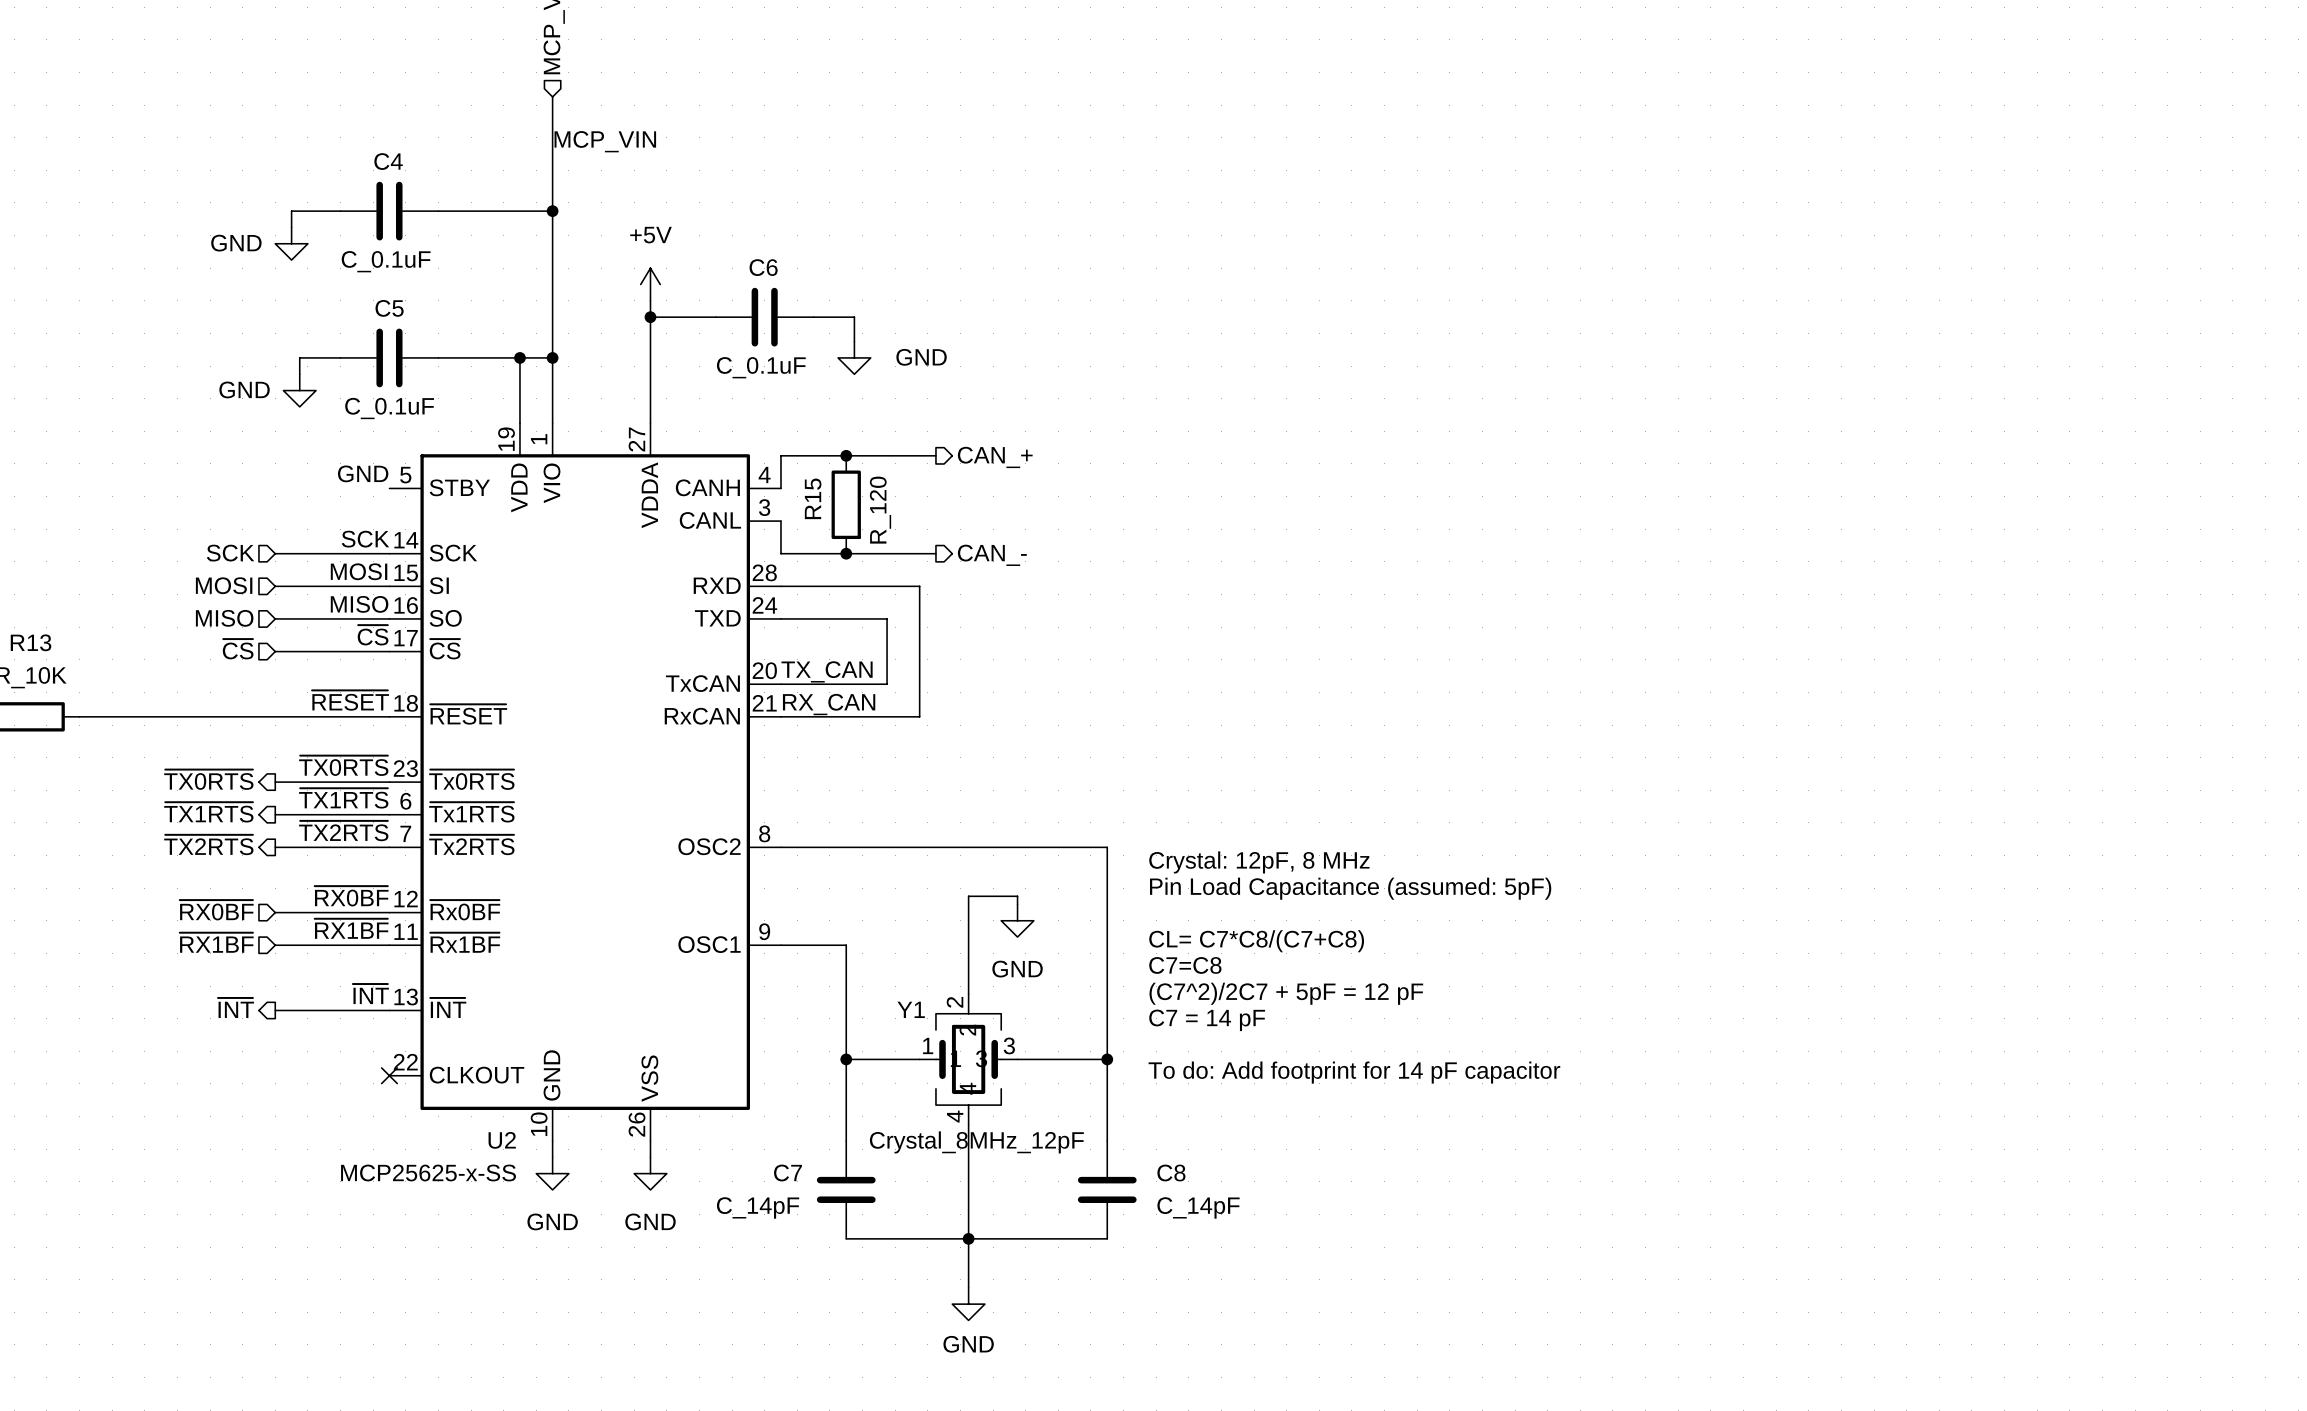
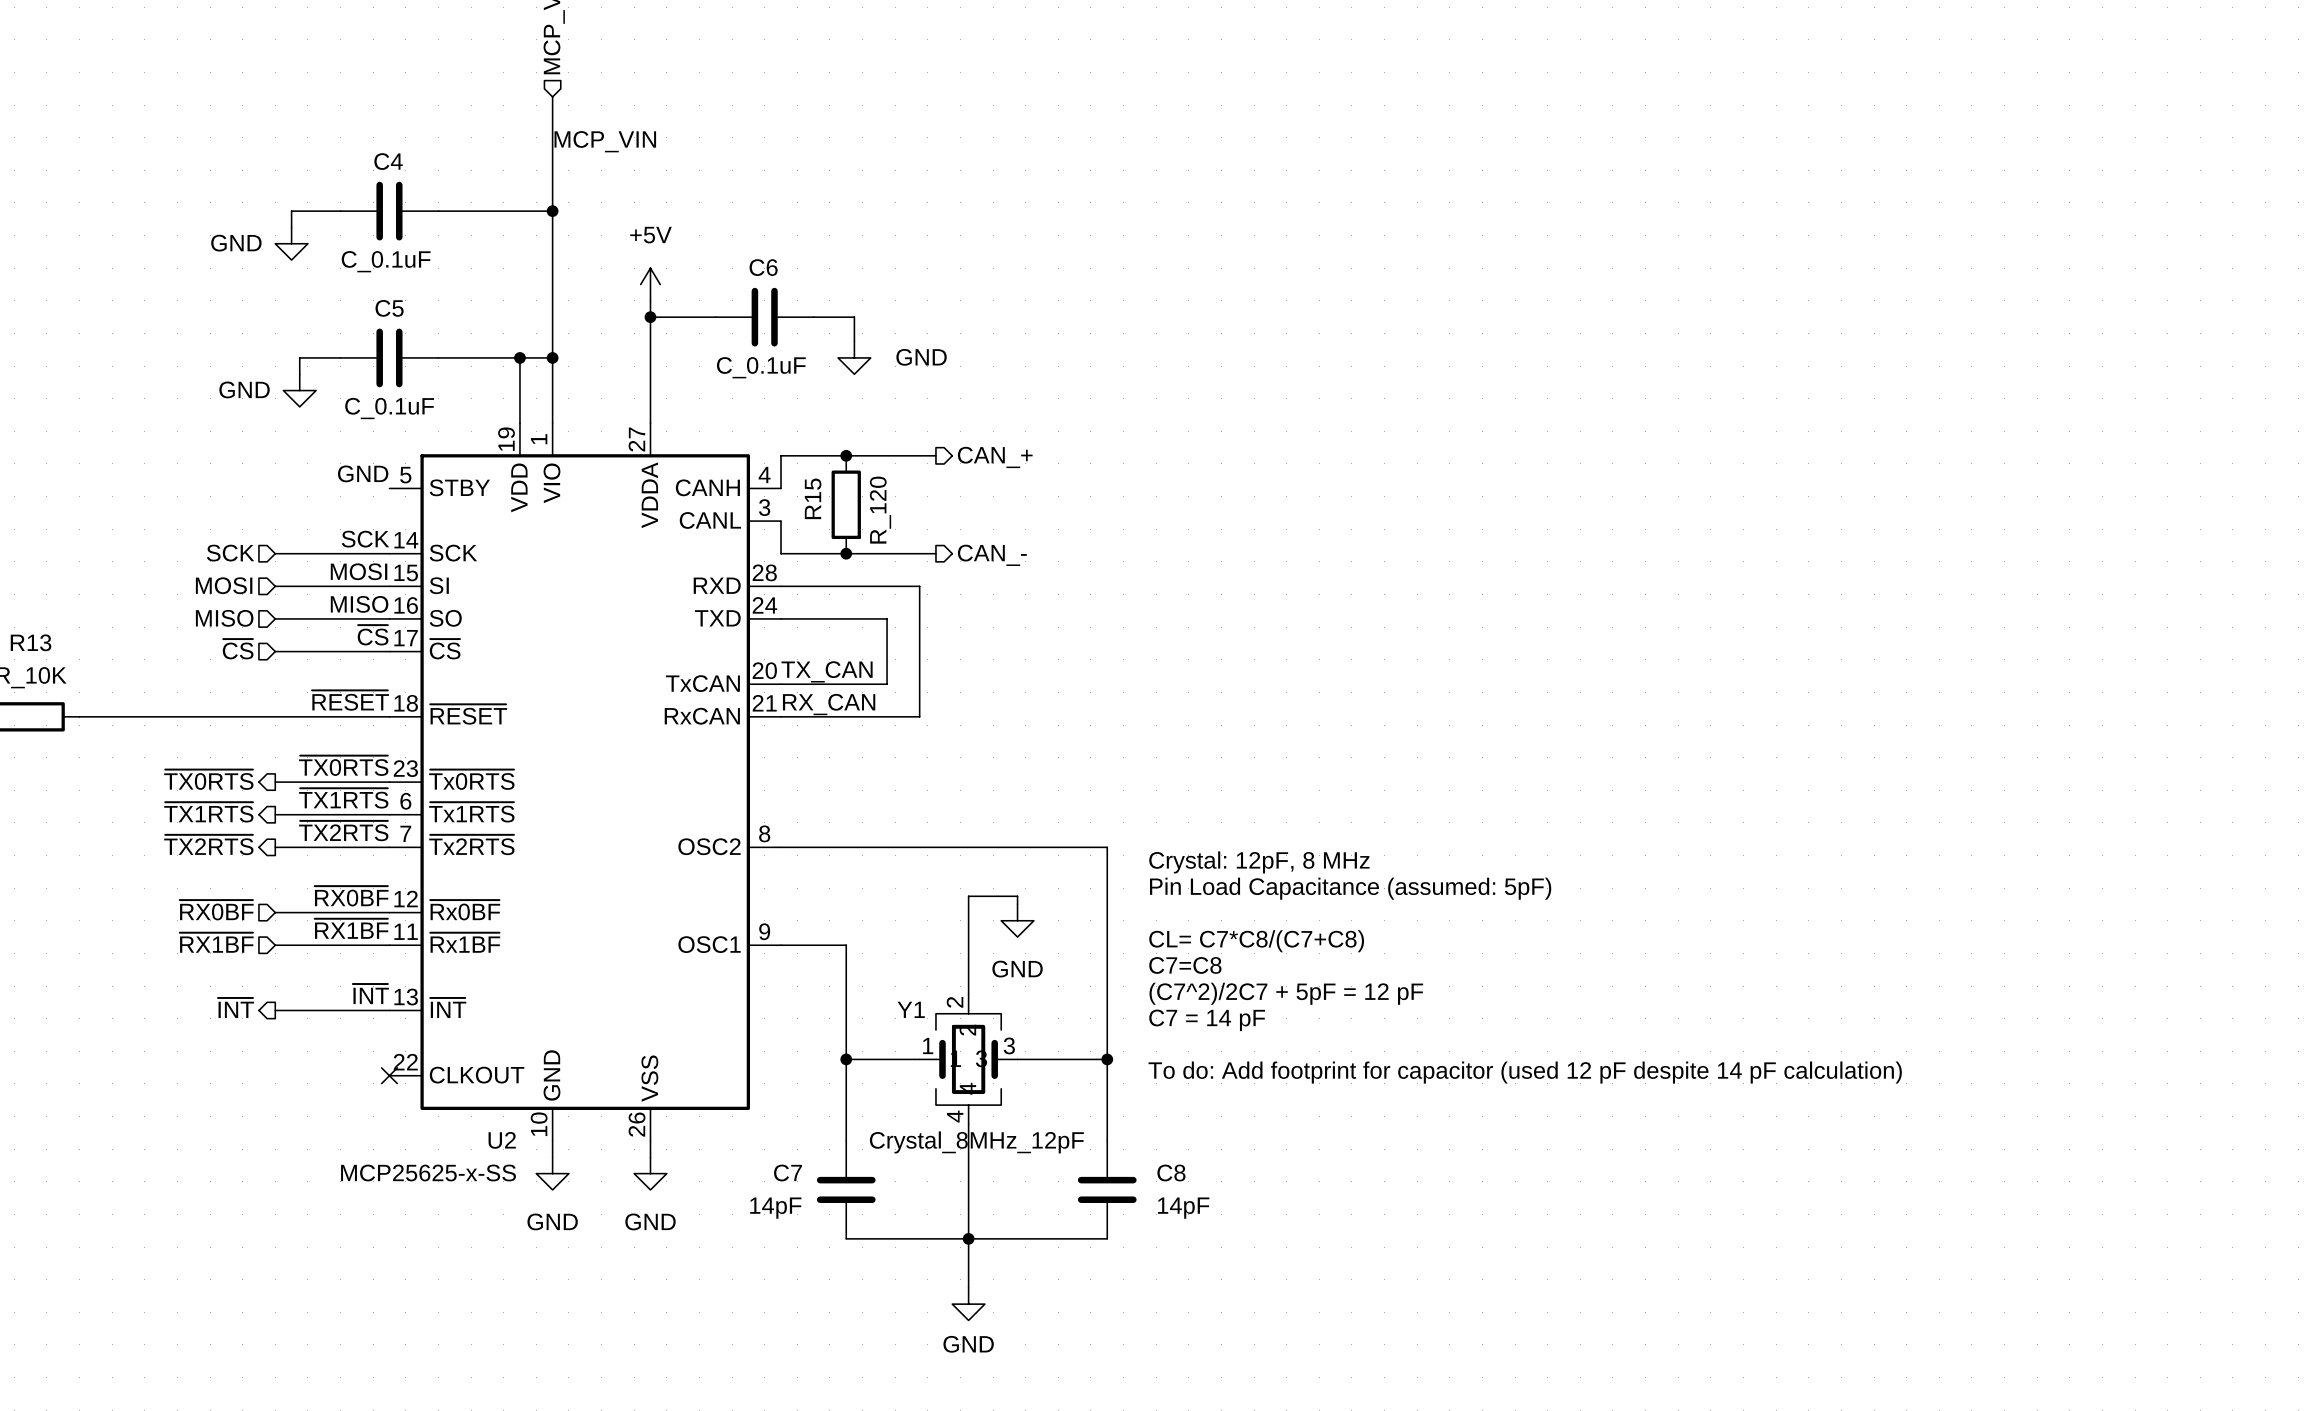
text: To do: Add footprint for 14 pF capacitor (1354, 1072) -> To do: Add footprint for capacitor (used 12 pF despite 14 pF calculation) (1525, 1072)
C7 value: C_14pF (758, 1207) -> 14pF (775, 1208)
C8 value: C_14pF (1198, 1207) -> 14pF (1183, 1208)

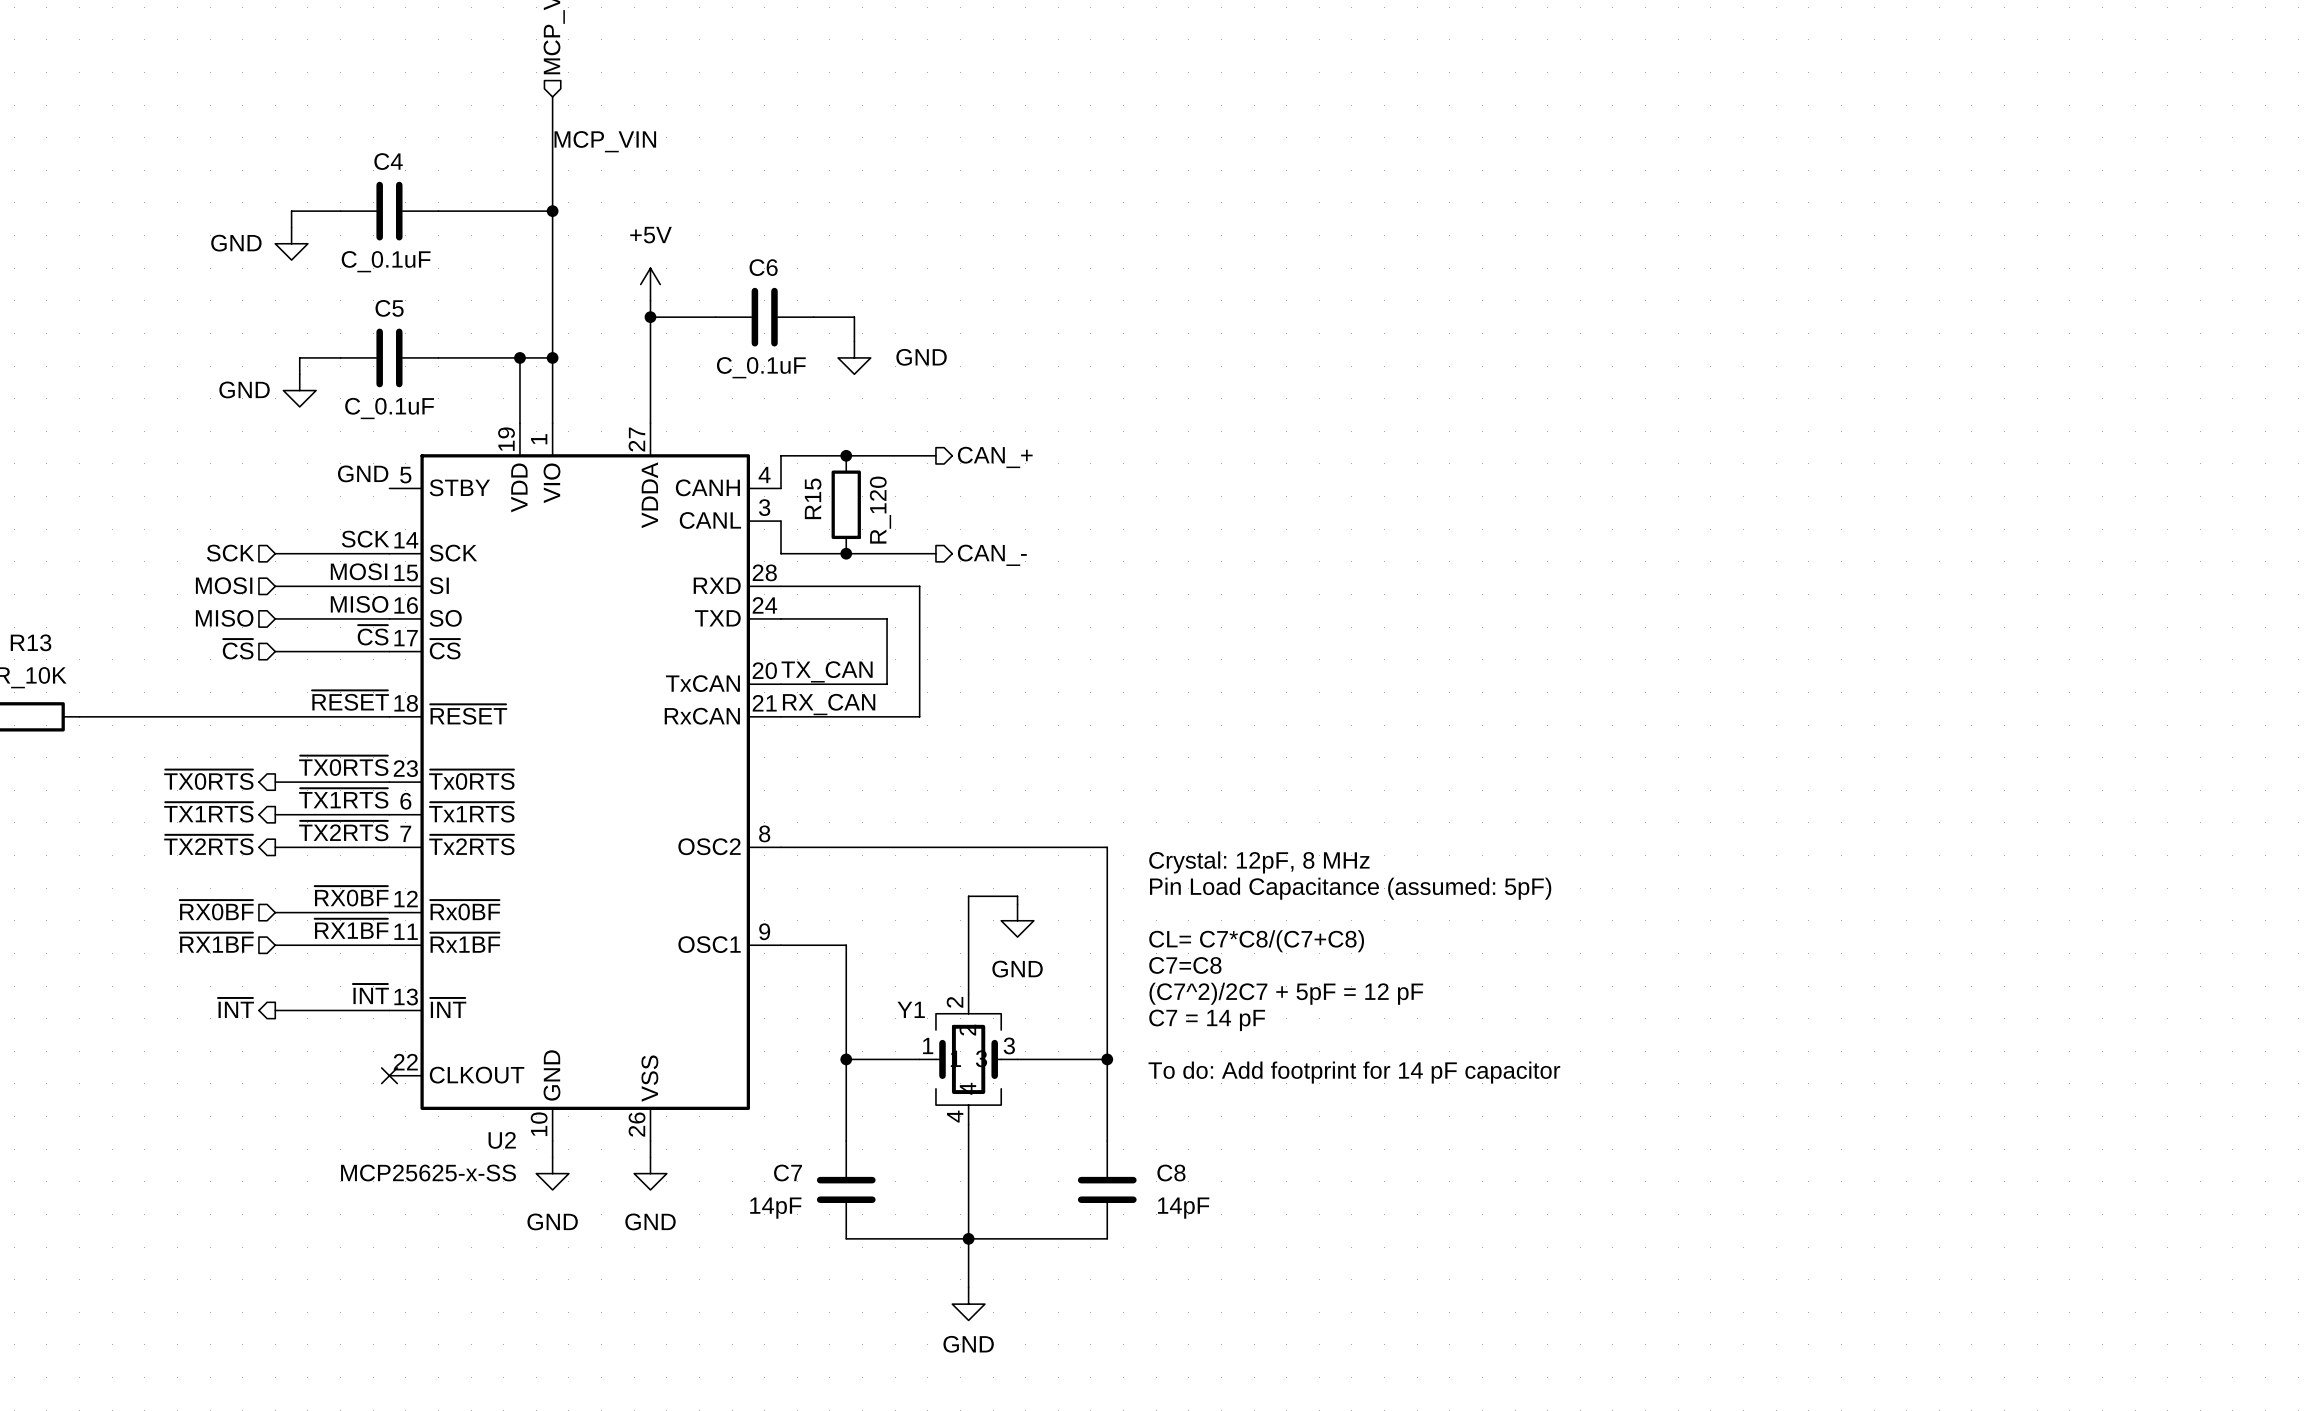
text: To do: Add footprint for capacitor (used 12 pF despite 14 pF calculation) (1525, 1072) -> To do: Add footprint for 14 pF capacitor (1354, 1072)
Y1 value: Crystal_8MHz_12pF (976, 1142) -> none

